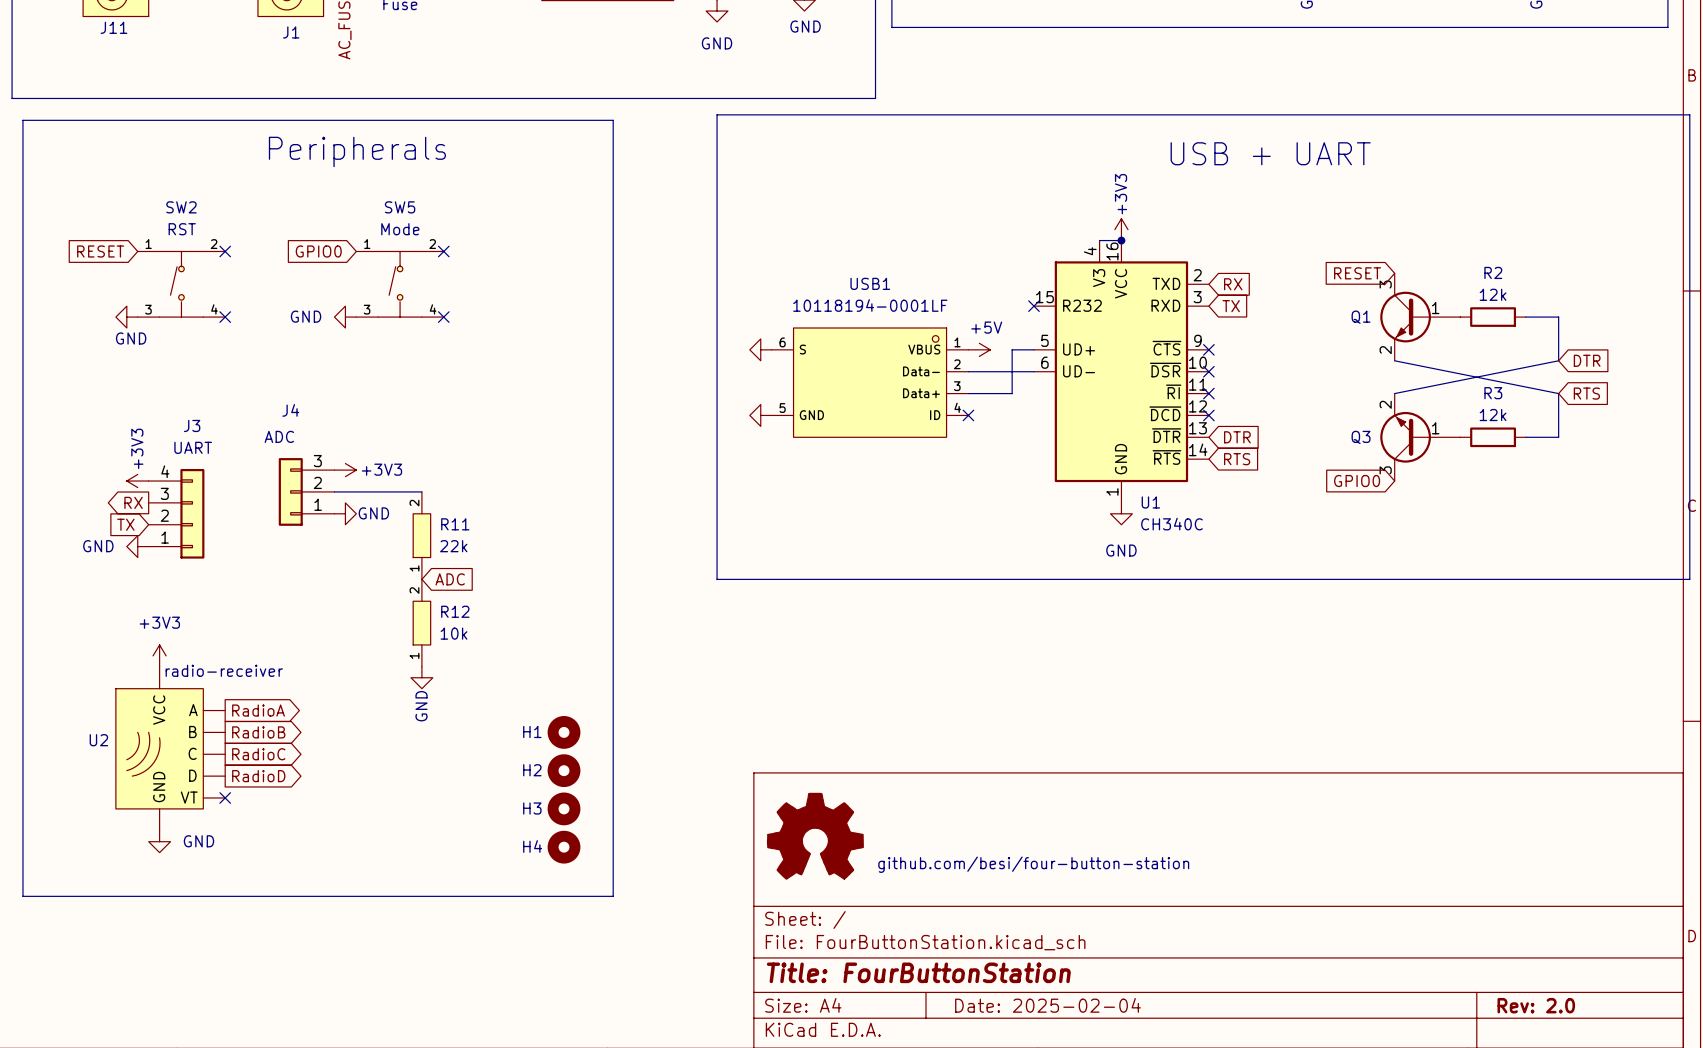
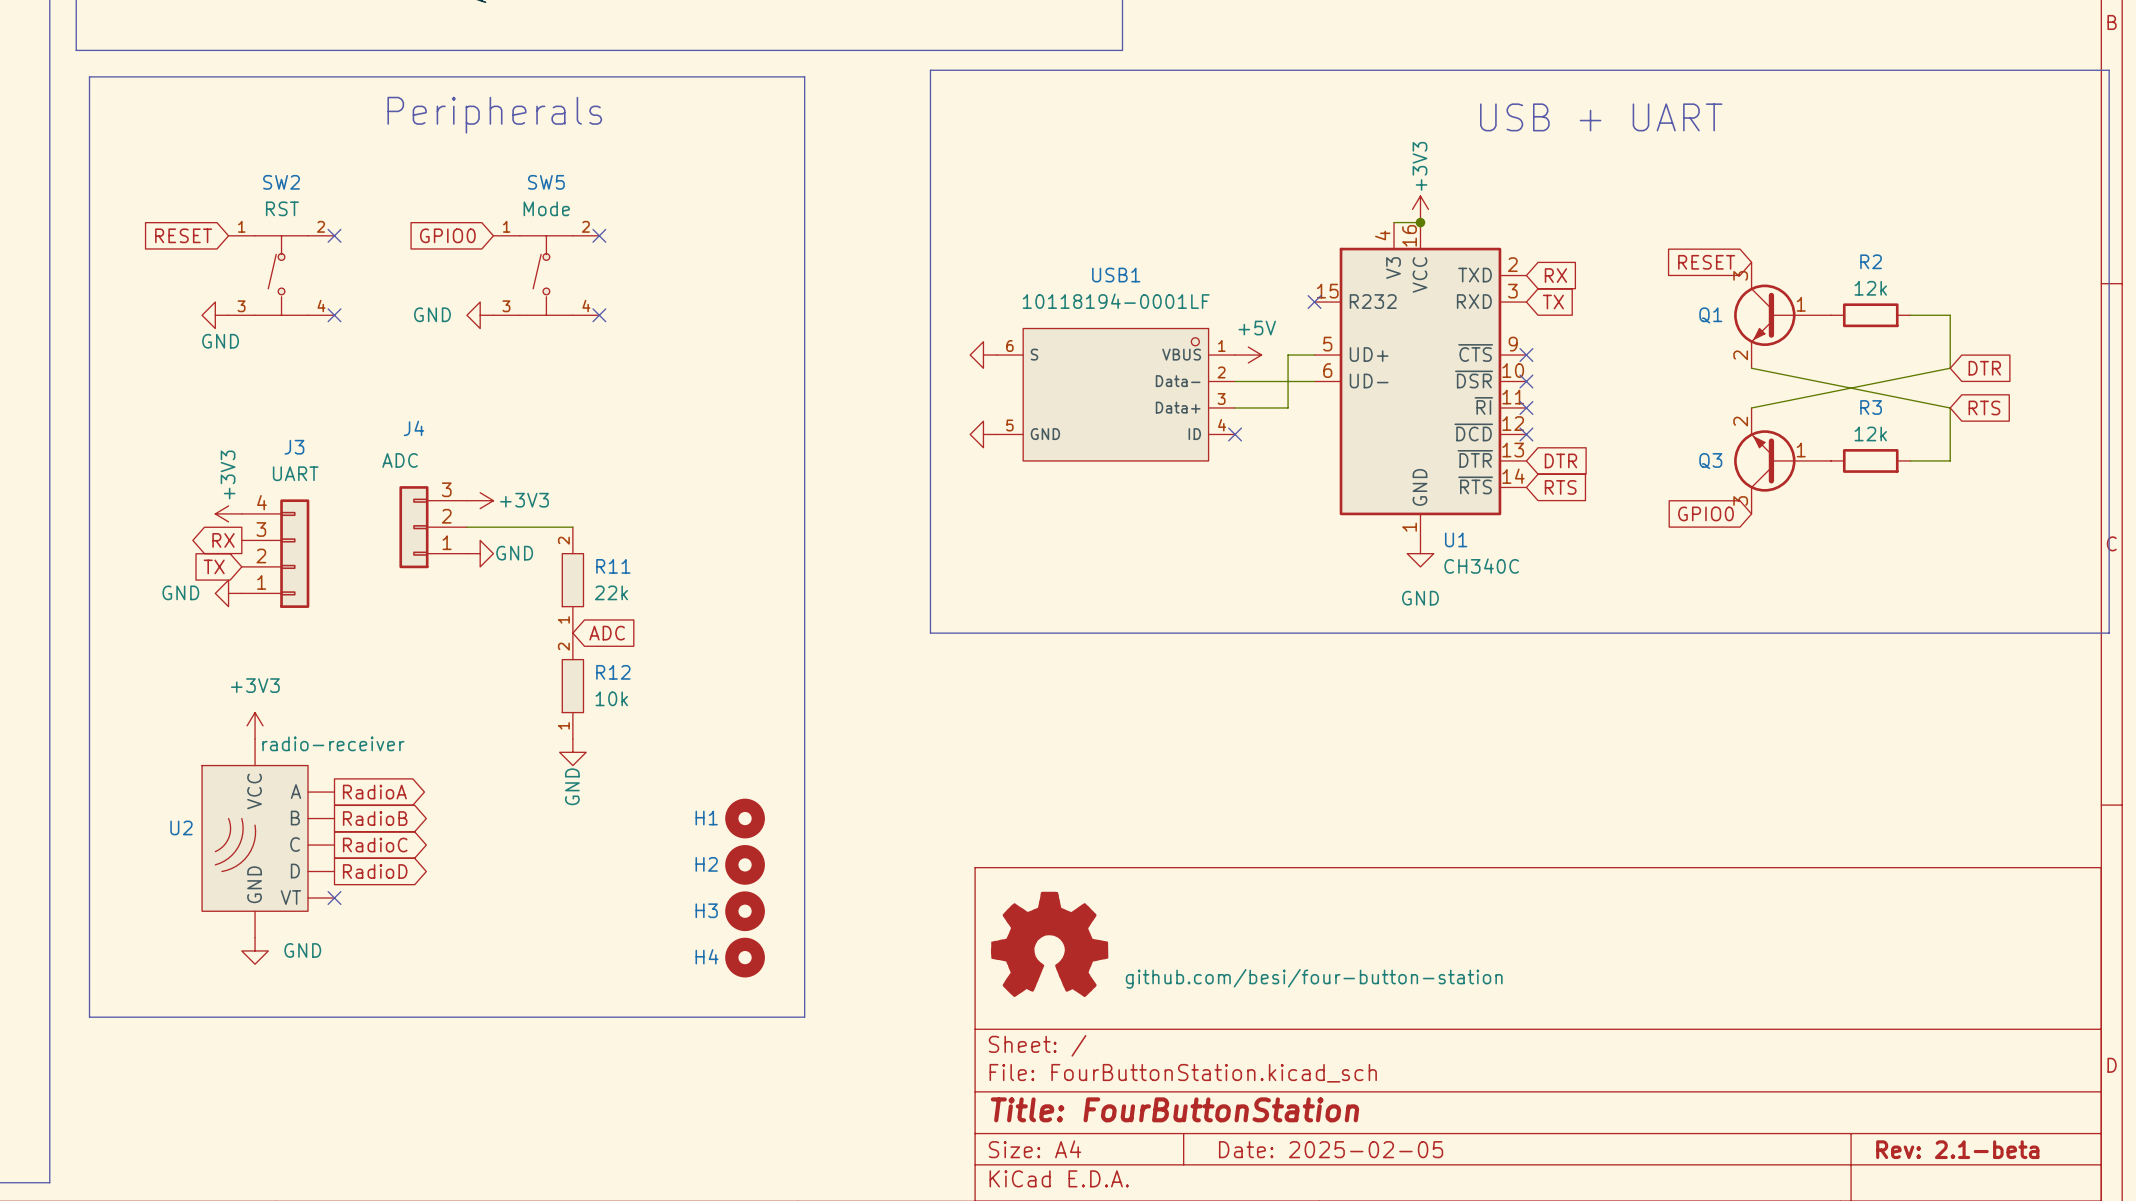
title block: Date: 2025-02-04 (1047, 1005) -> Date: 2025-02-05 (1331, 1149)
title block: Rev: 2.0 (1536, 1005) -> Rev: 2.1-beta (1957, 1149)

